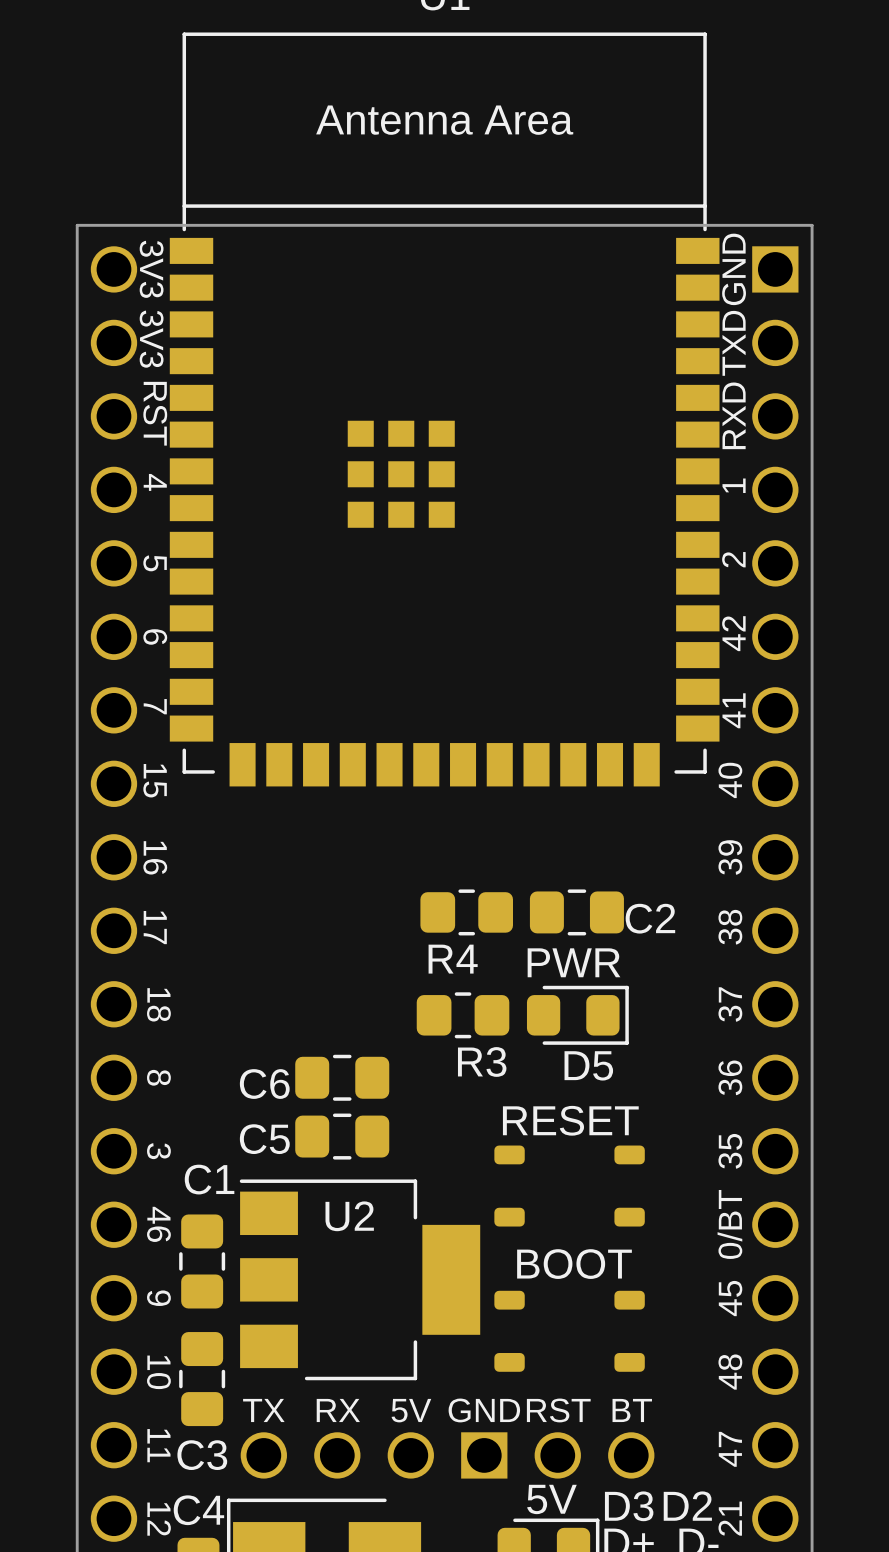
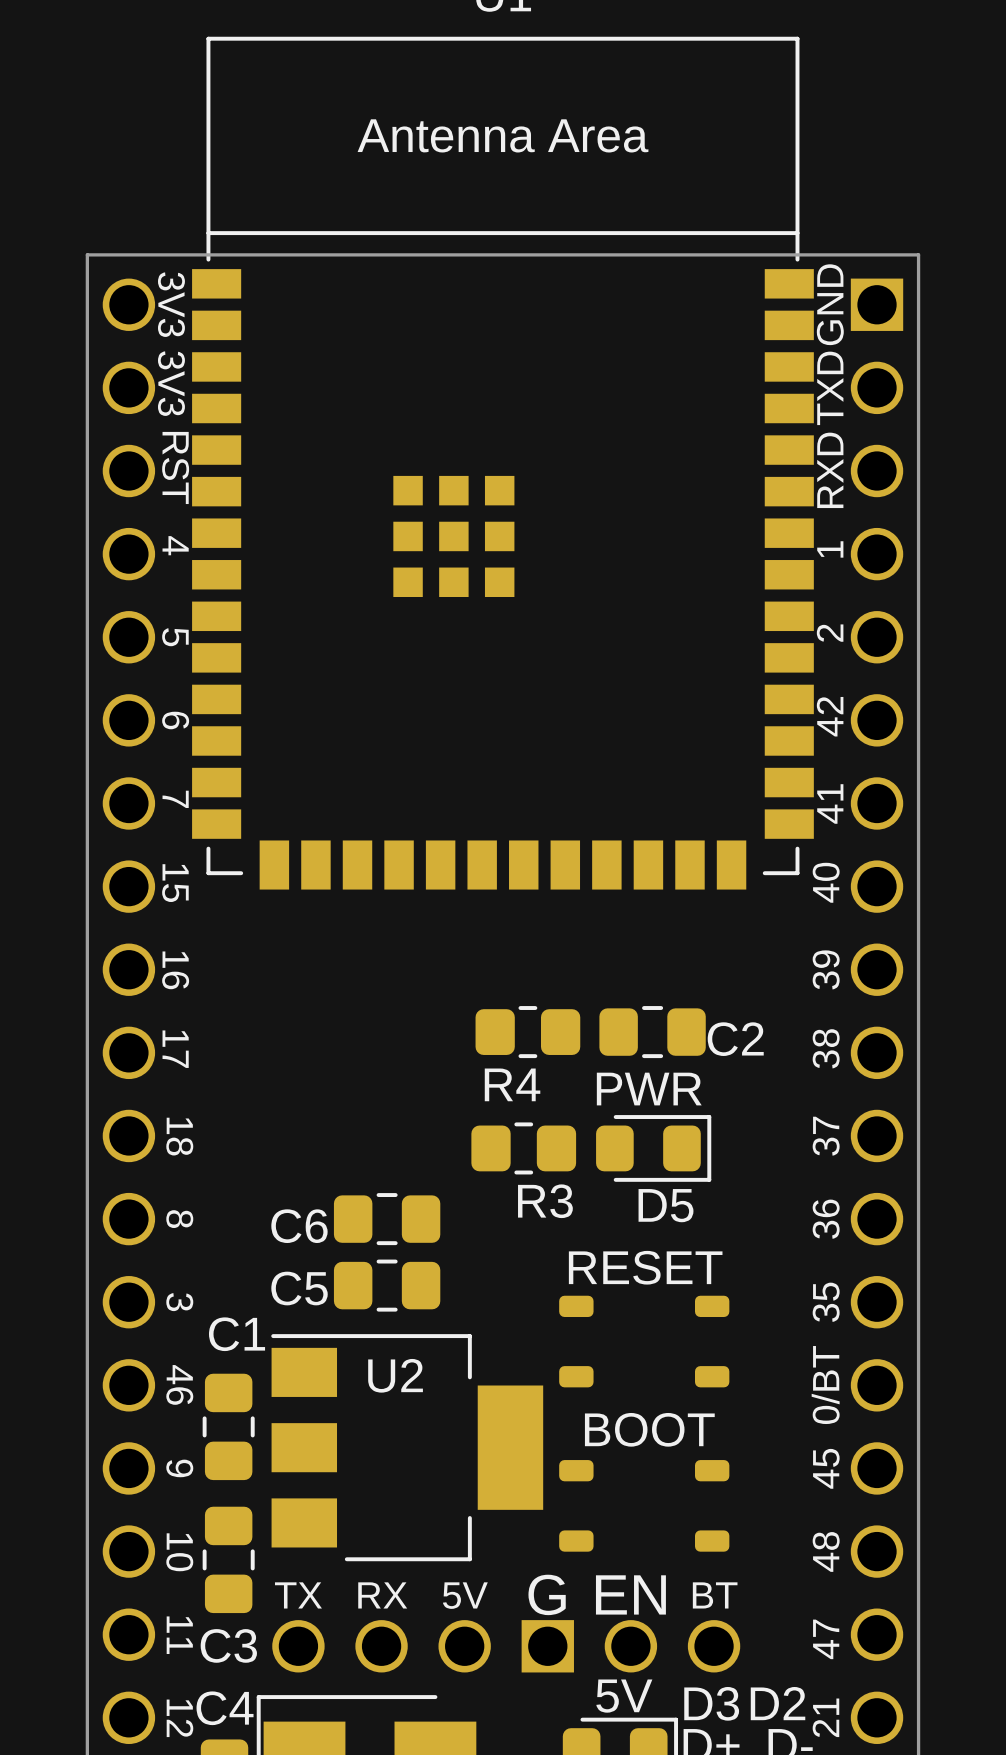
part text: GND (484, 1410) -> G (547, 1594)
part text: RST (558, 1410) -> EN (630, 1594)

